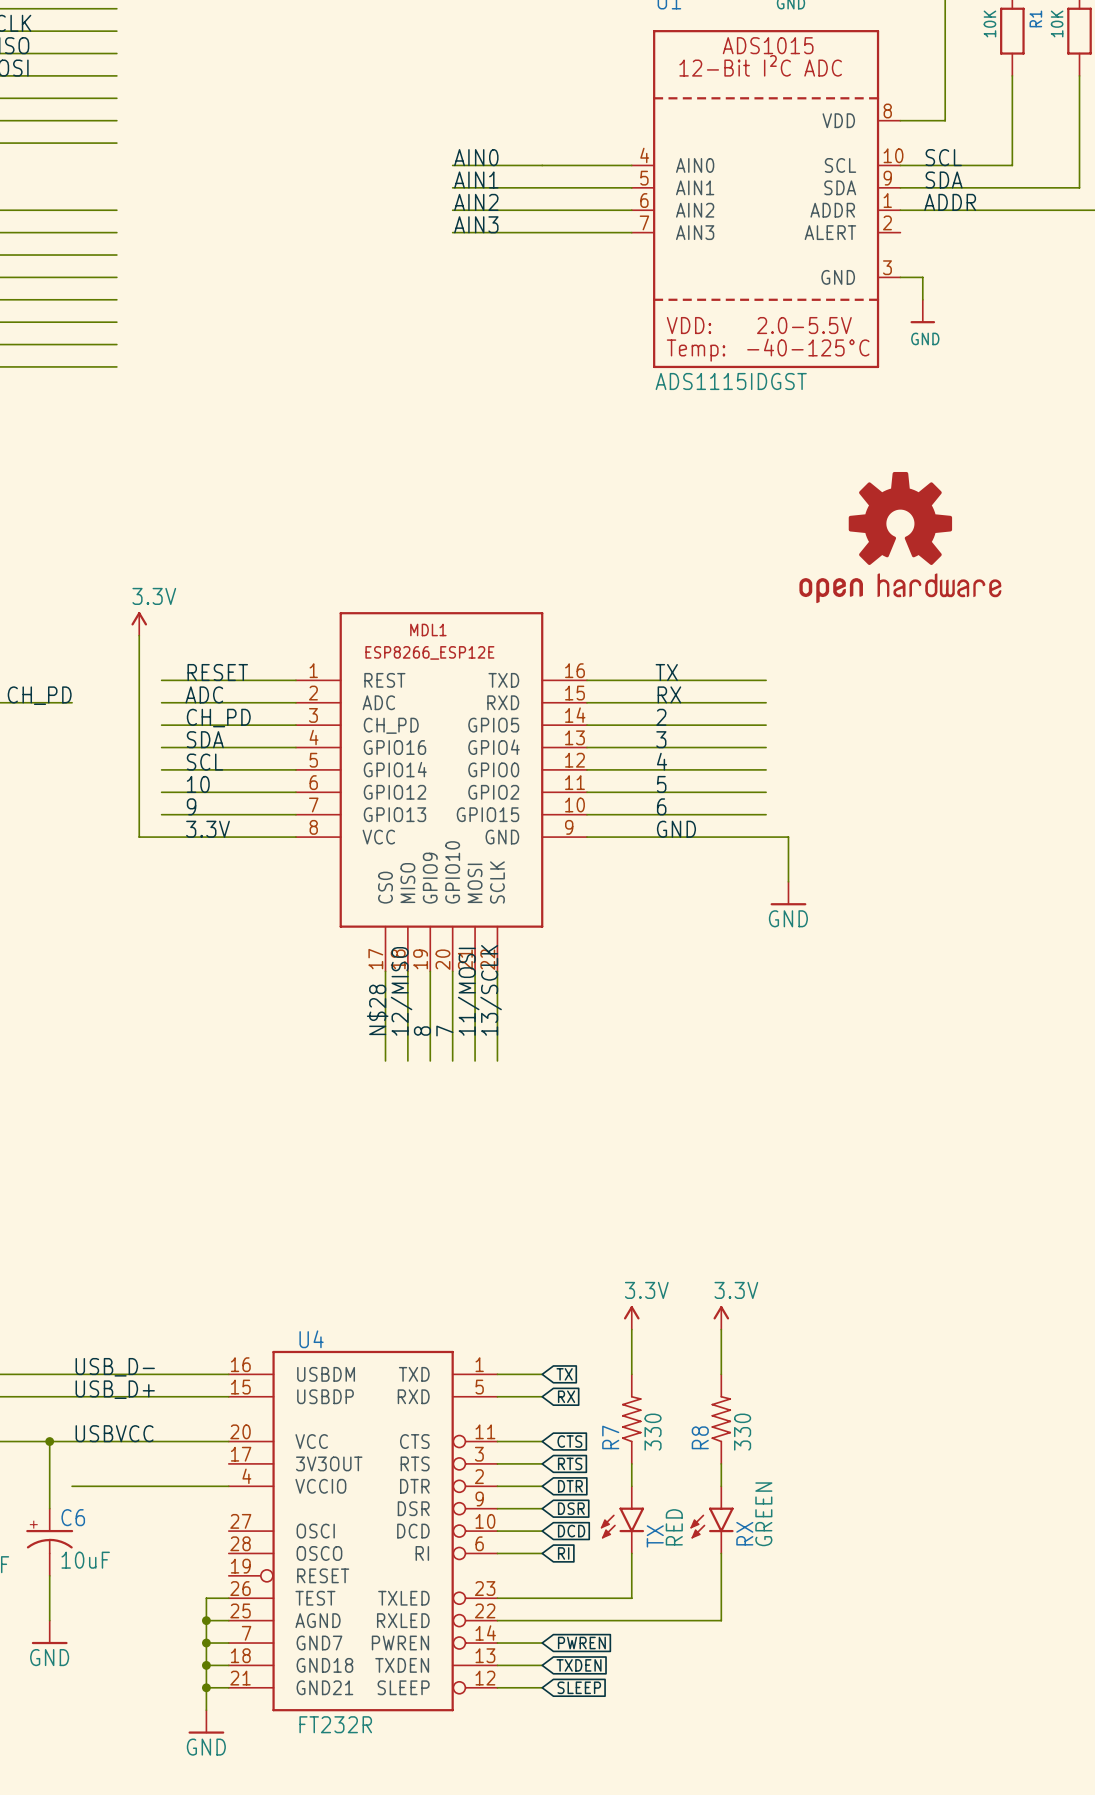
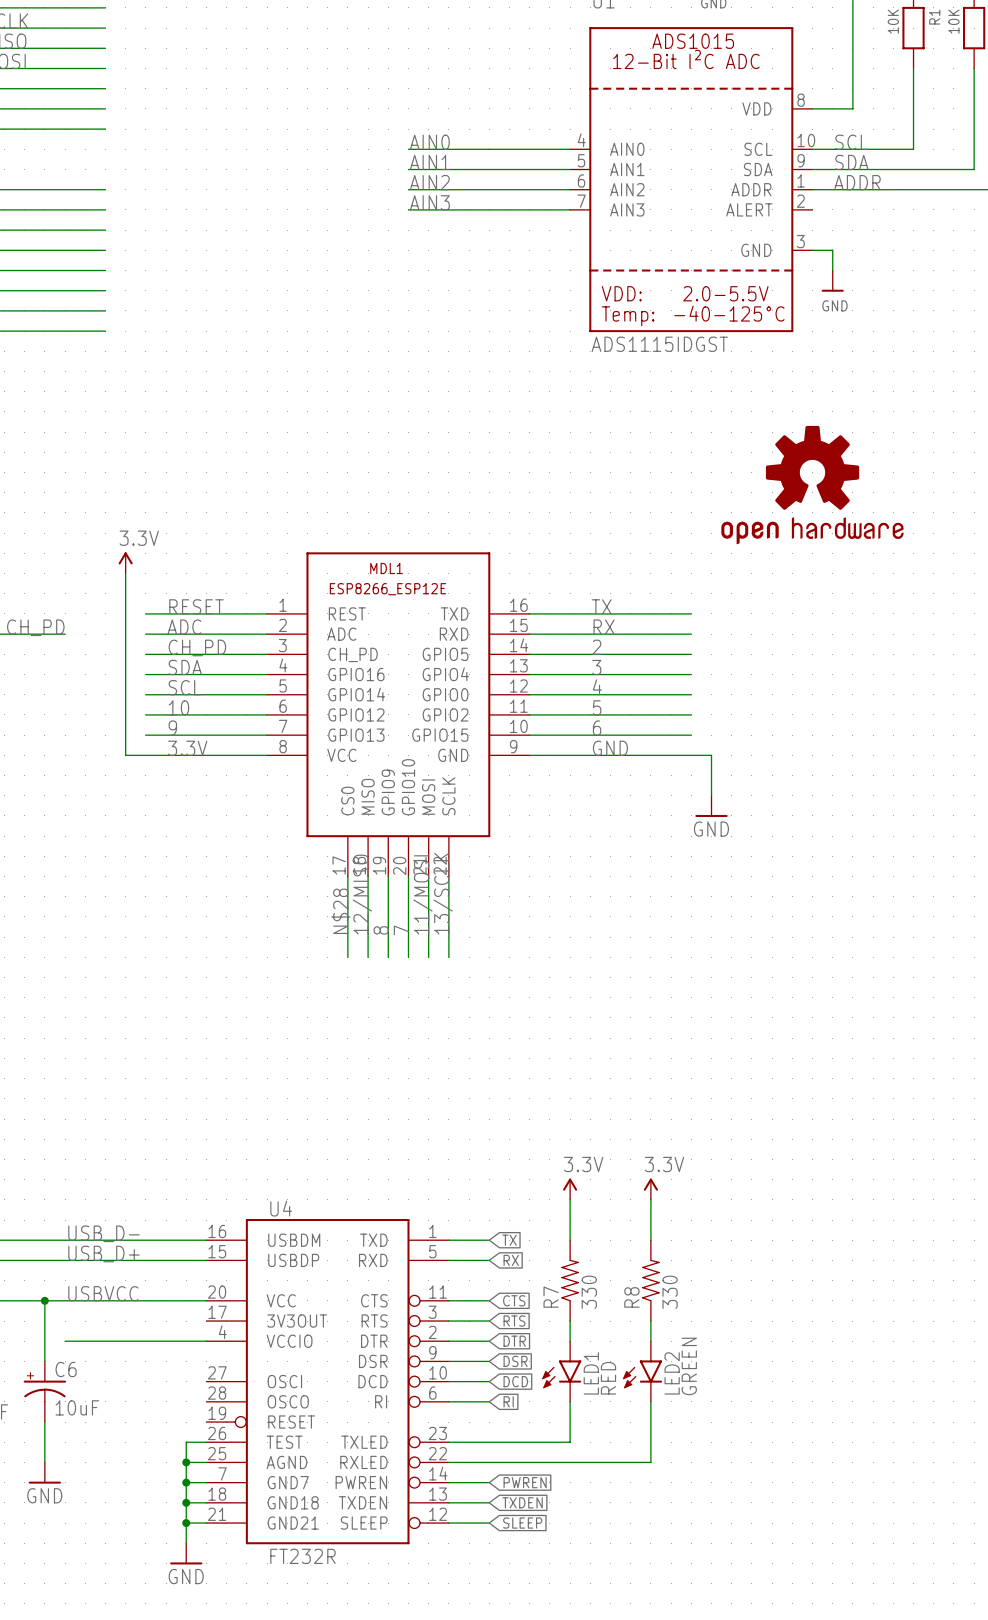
RX name: RX (744, 1533) -> LED2 (672, 1373)
TX name: TX (655, 1536) -> LED1 (591, 1373)

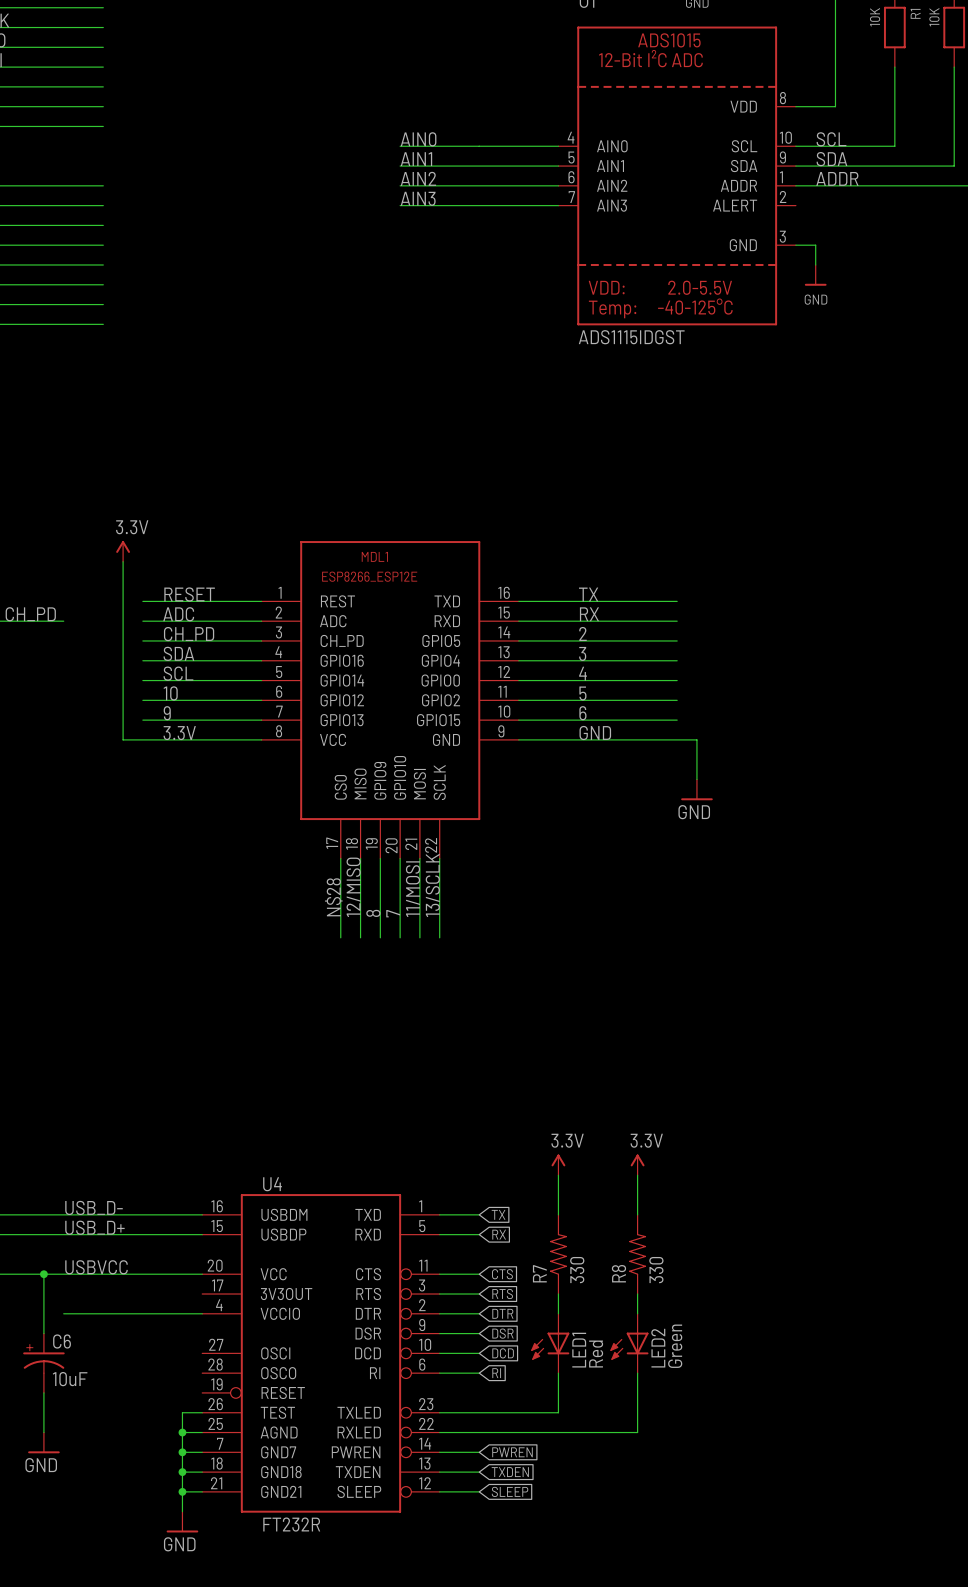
part: (812, 485) -> none
LED1 symbol: [542, 1341, 582, 1402] -> [531, 1313, 570, 1374]
LED2 symbol: [623, 1341, 663, 1402] -> [610, 1313, 649, 1374]
LED2 value: GREEN (689, 1366) -> Green (675, 1346)
LED1 value: RED (608, 1378) -> Red (596, 1354)

